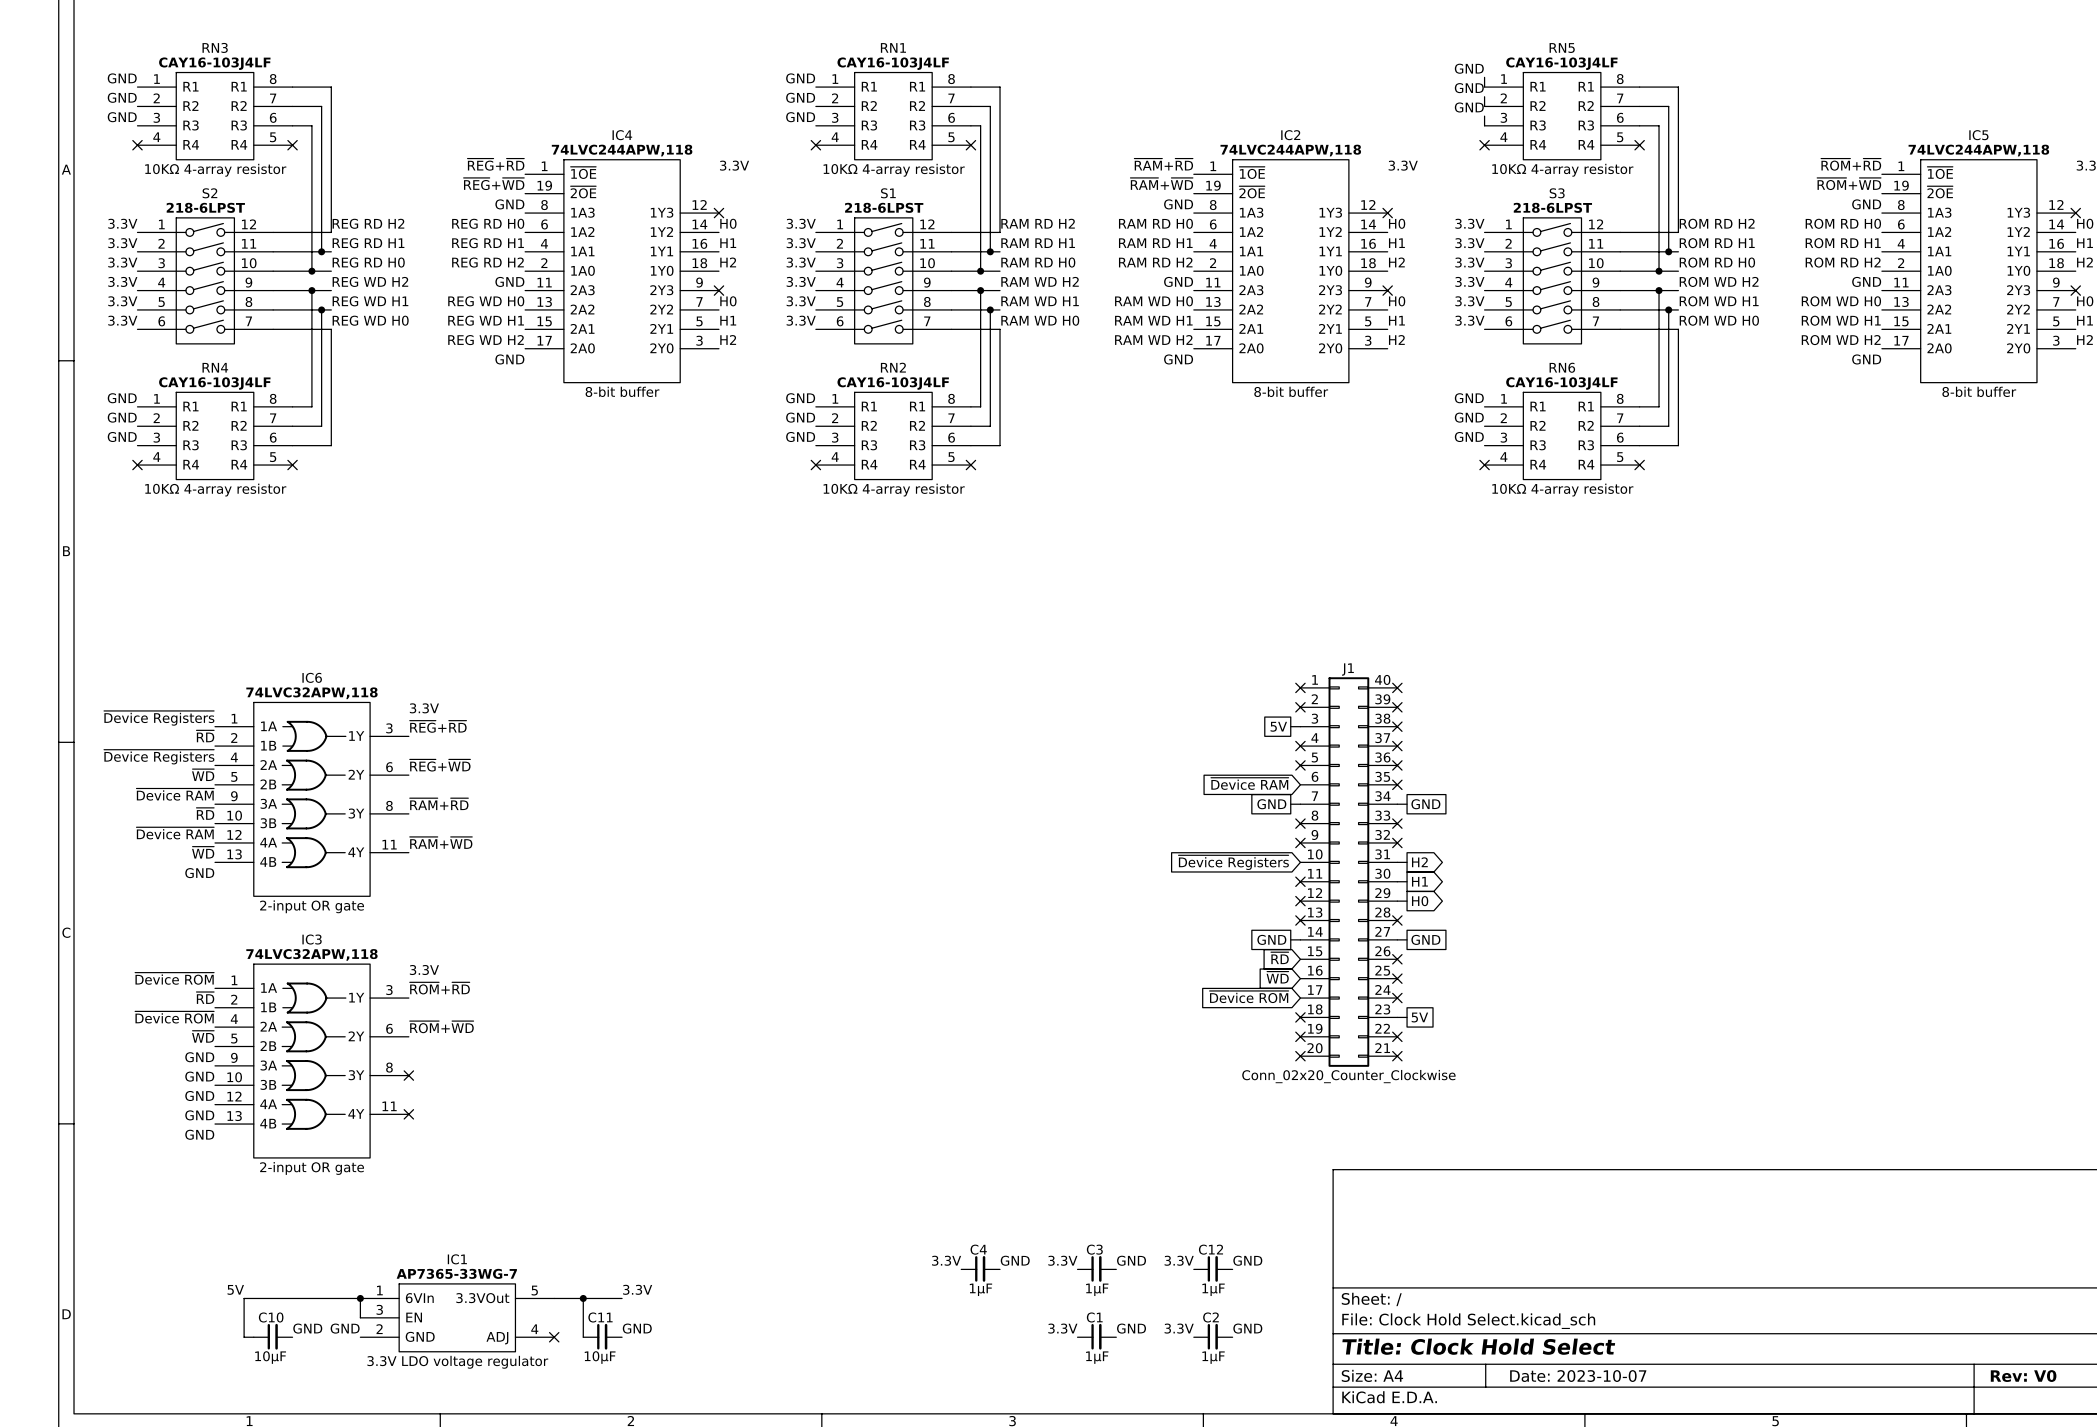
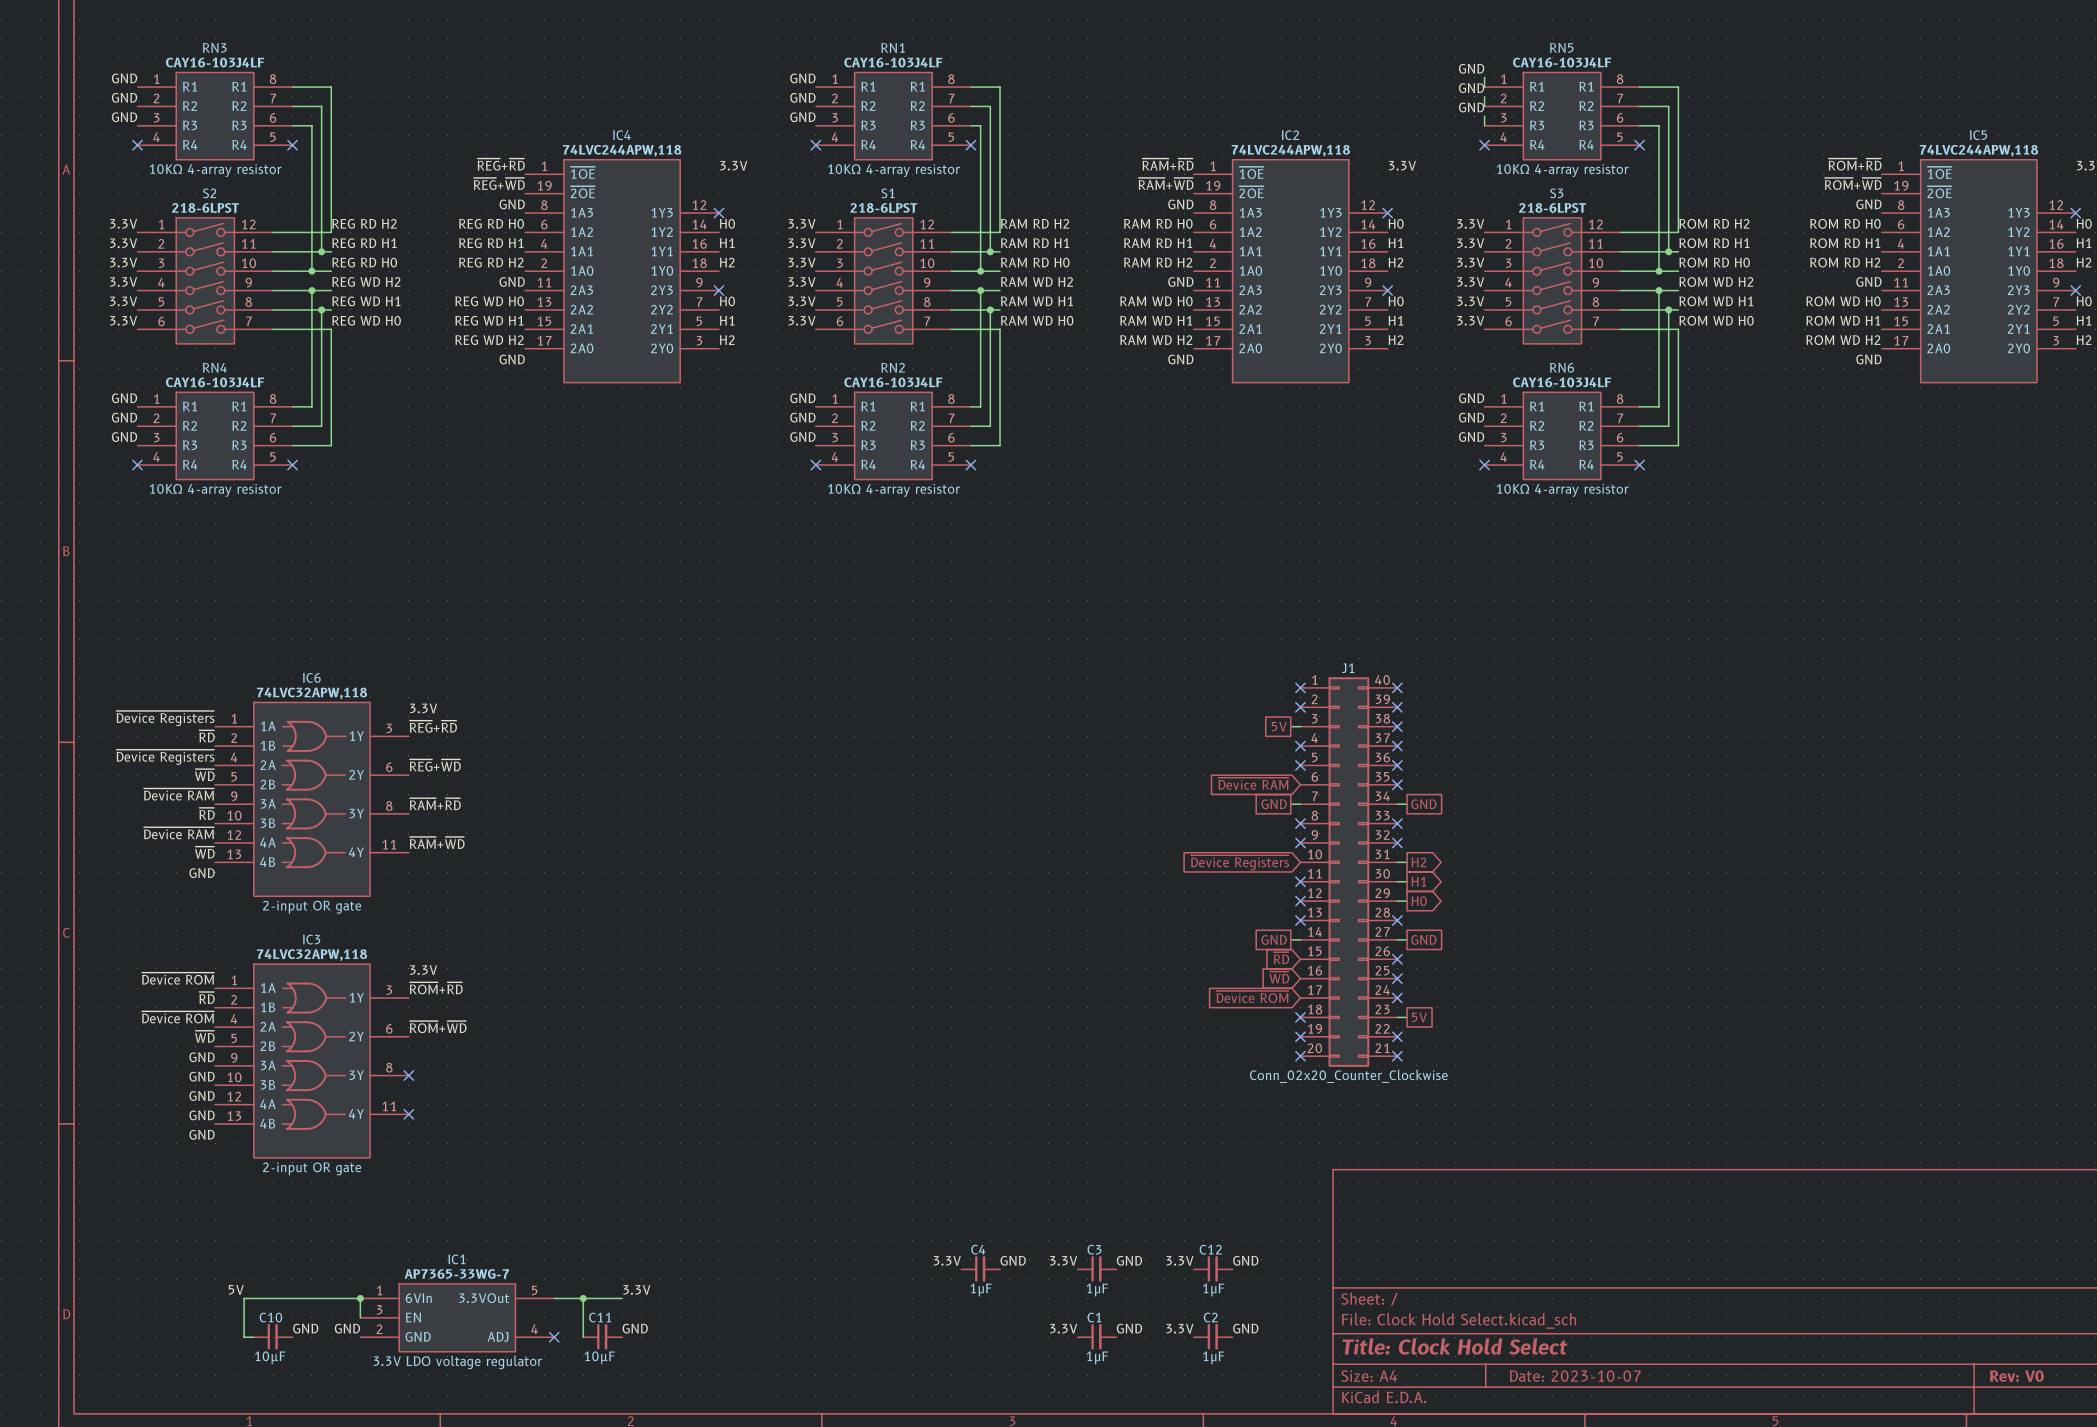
IC4 text: 8-bit buffer (622, 391) -> none
IC2 text: 8-bit buffer (1291, 391) -> none
IC5 text: 8-bit buffer (1979, 391) -> none

